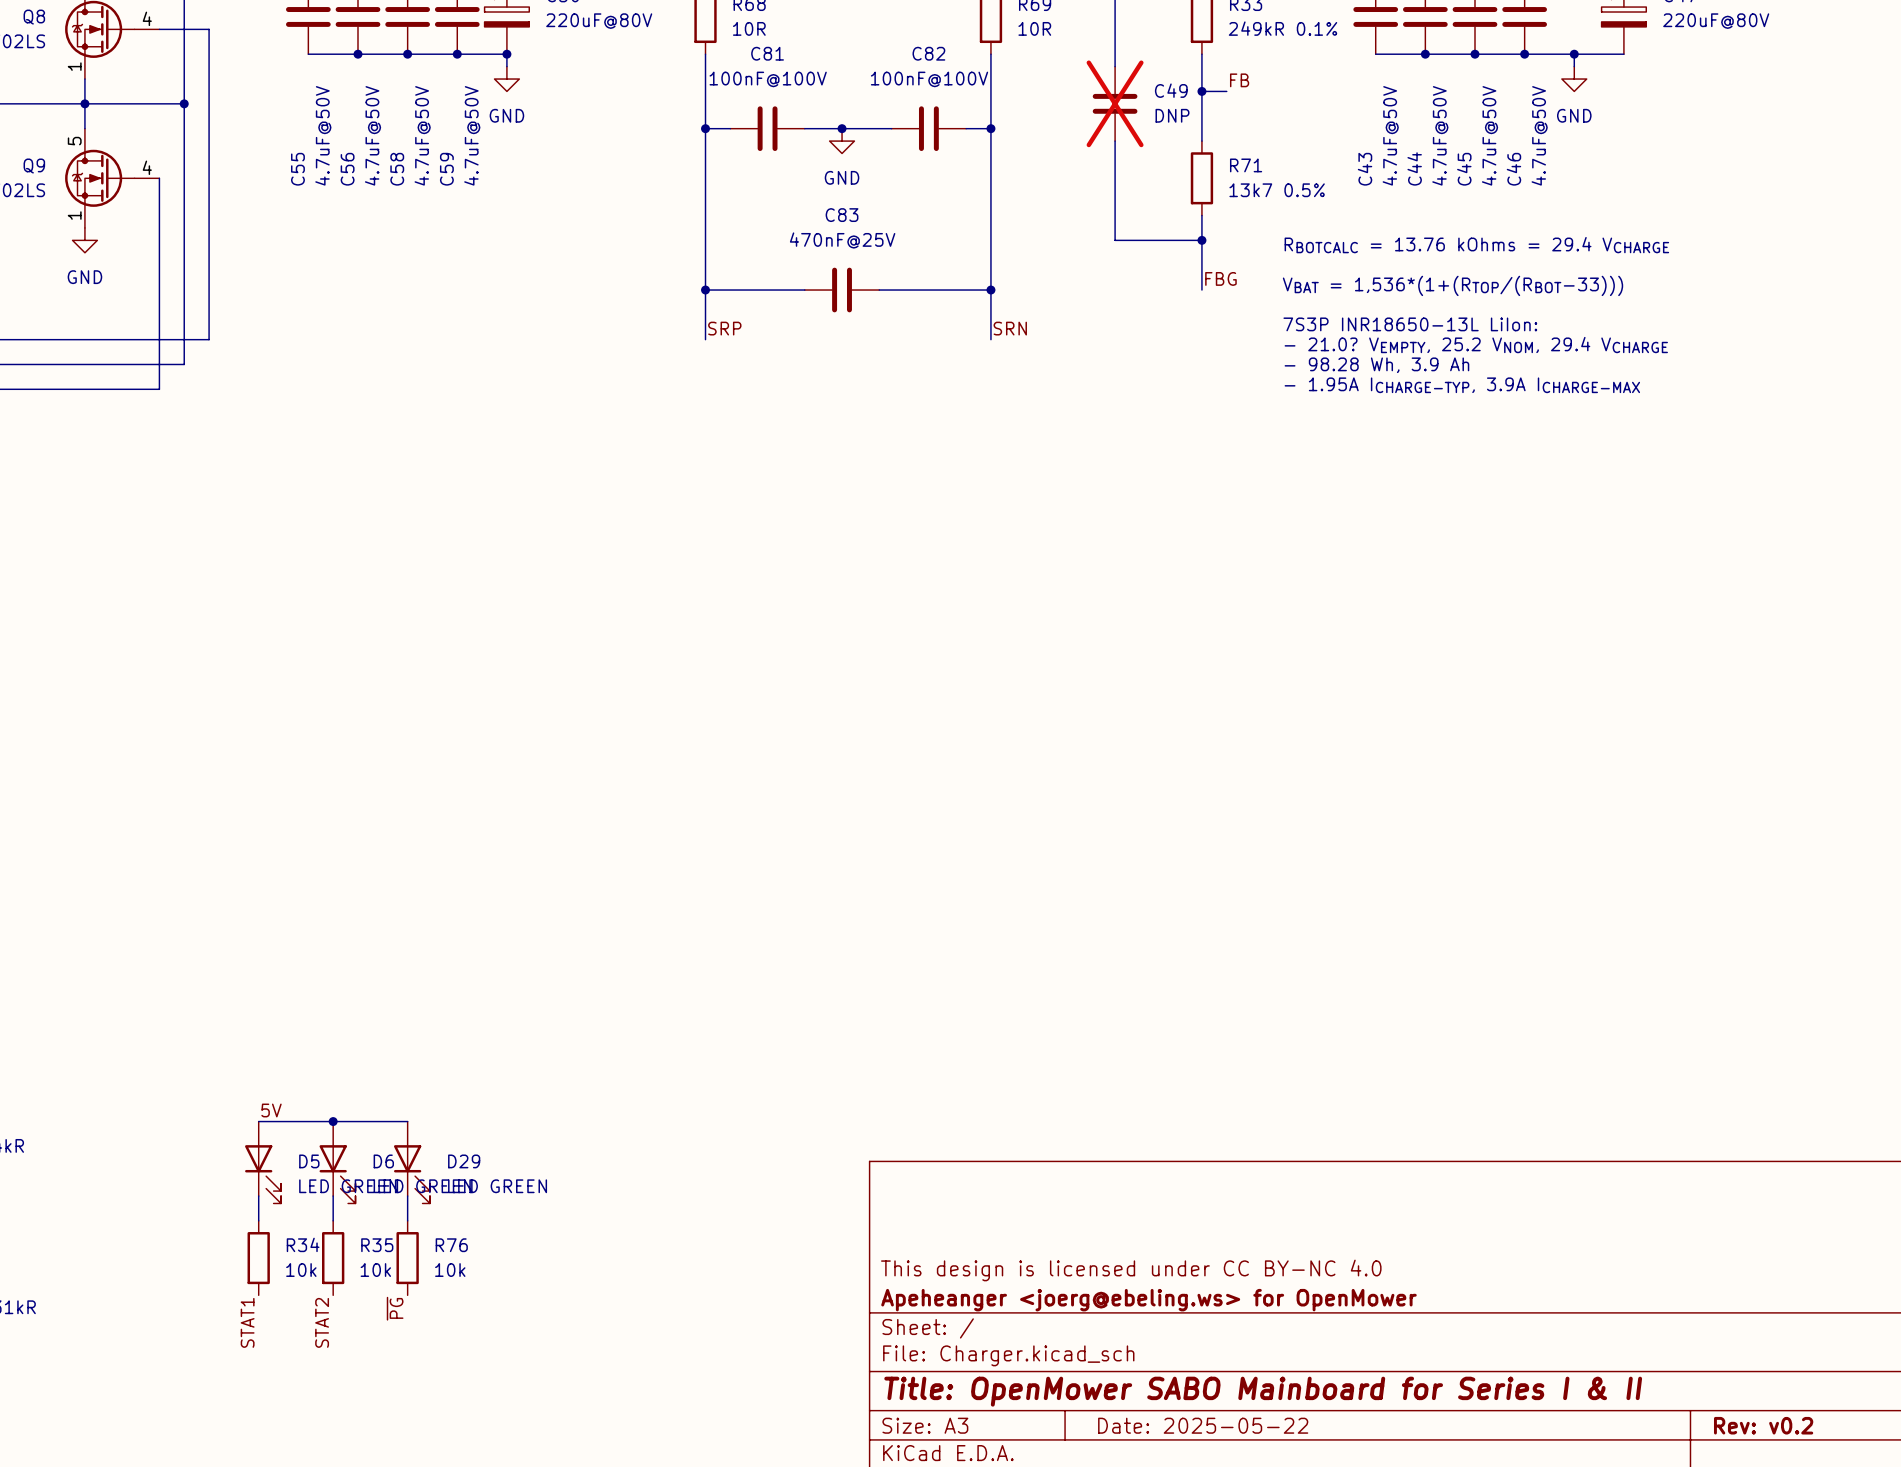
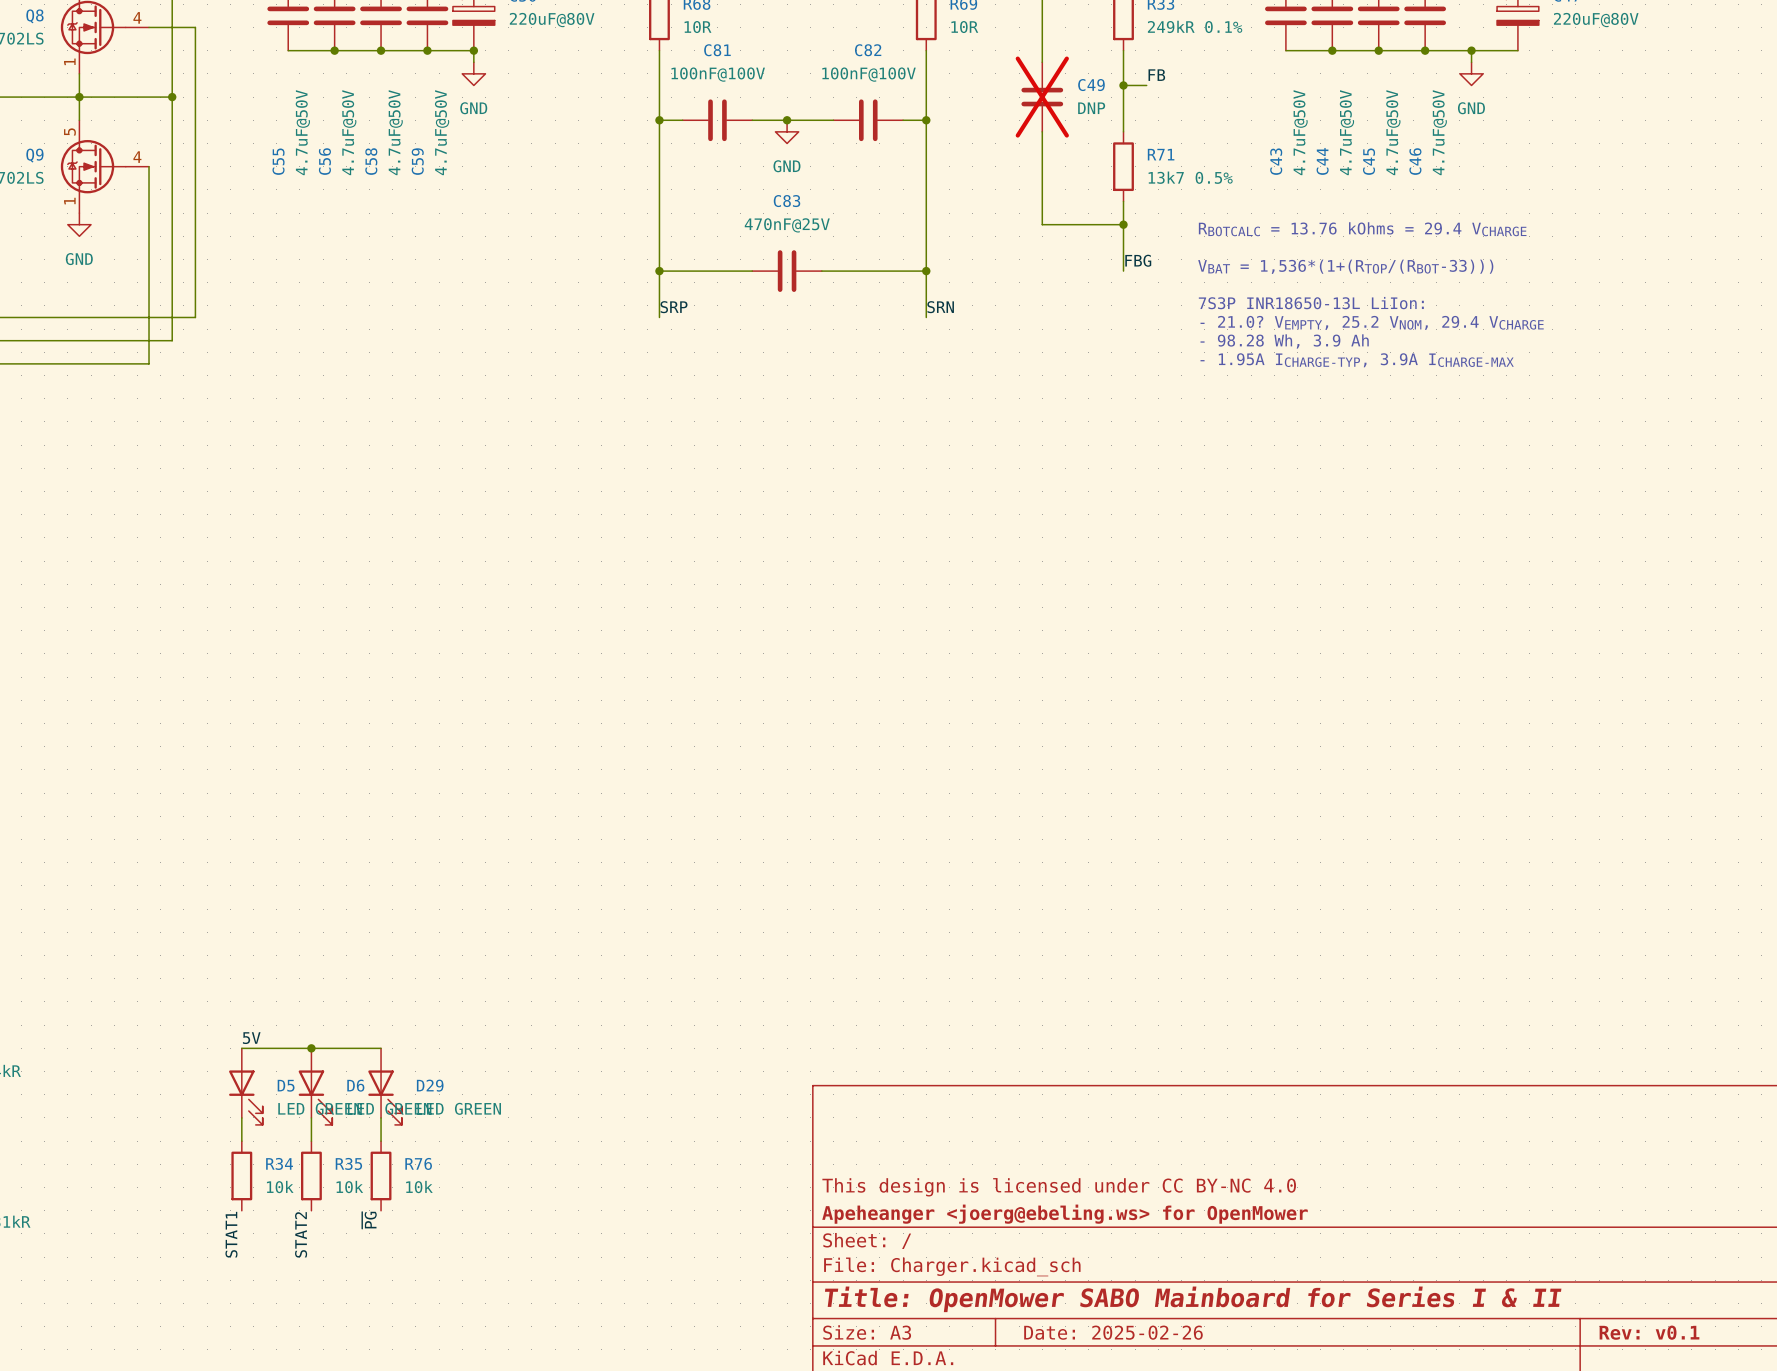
title block: Date: 2025-05-22 (1203, 1425) -> Date: 2025-02-26 (1113, 1332)
title block: Rev: v0.2 (1763, 1425) -> Rev: v0.1 (1649, 1332)

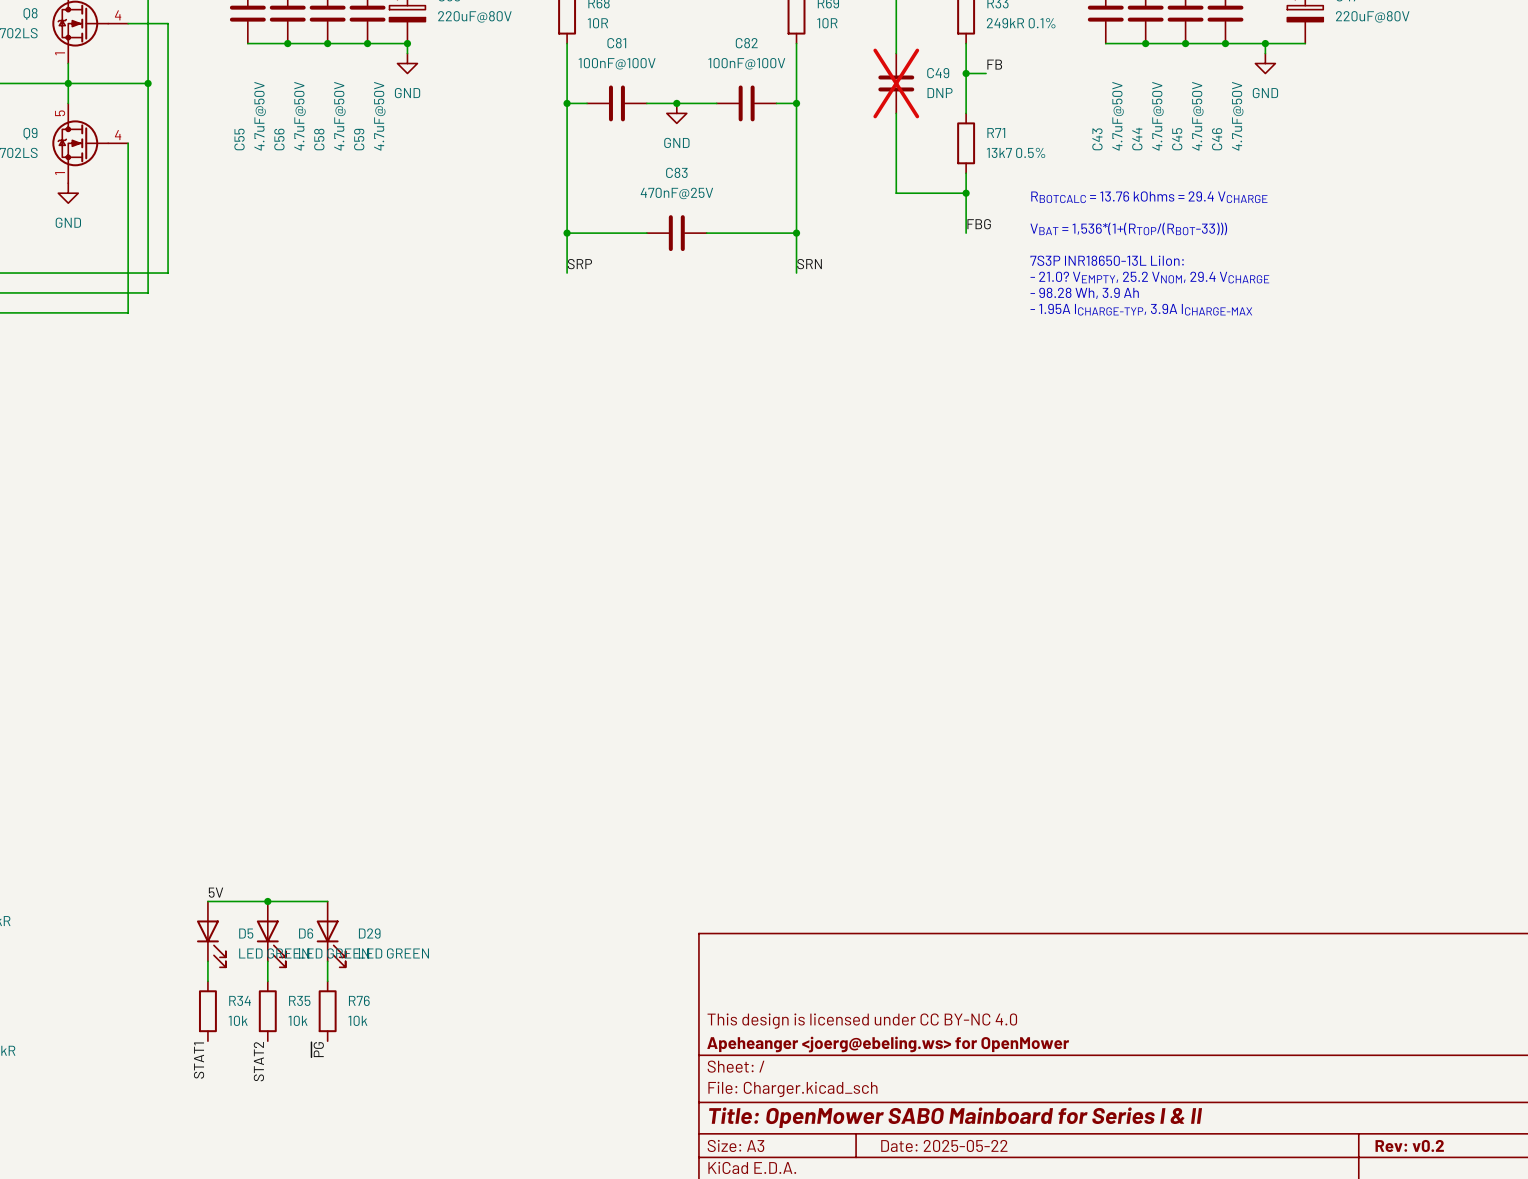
title block: Date: 2025-02-26 (1113, 1332) -> Date: 2025-05-22 (944, 1145)
title block: Rev: v0.1 (1649, 1332) -> Rev: v0.2 (1409, 1145)

